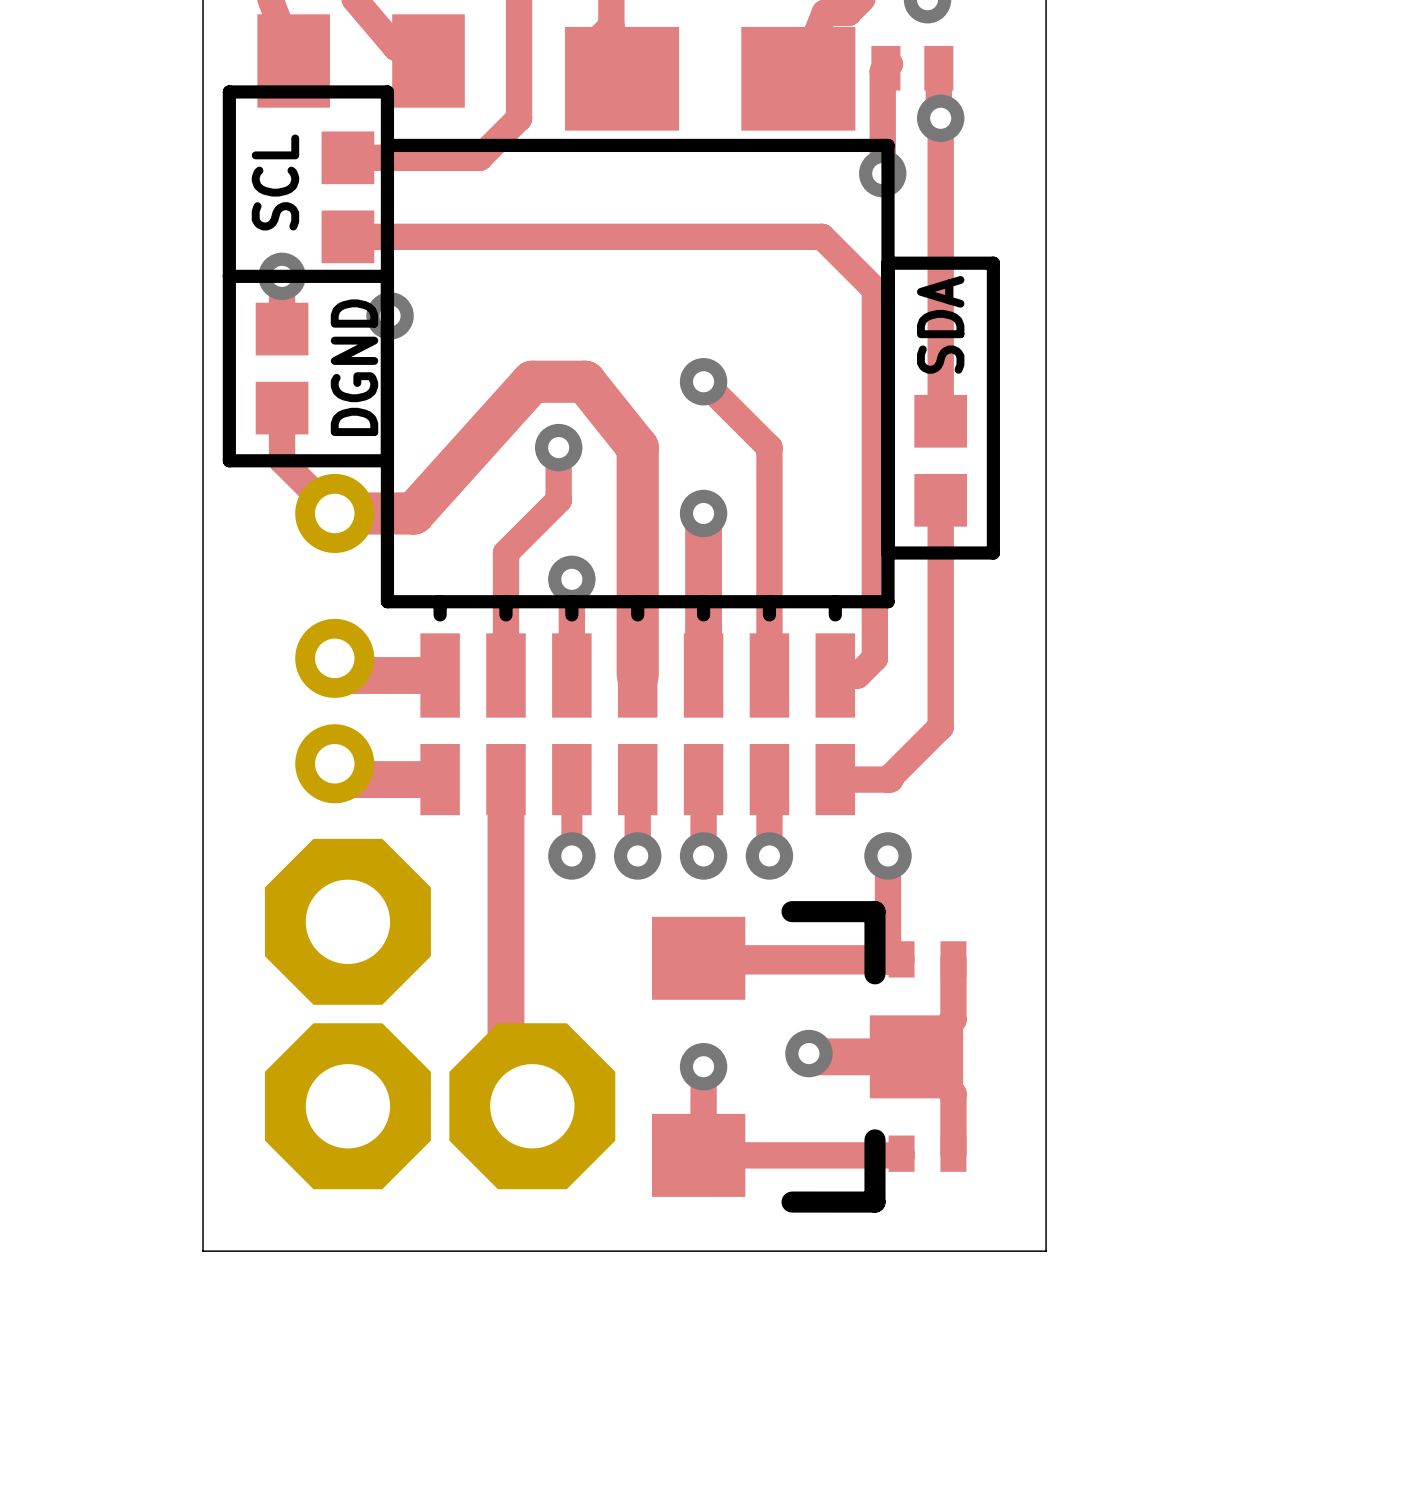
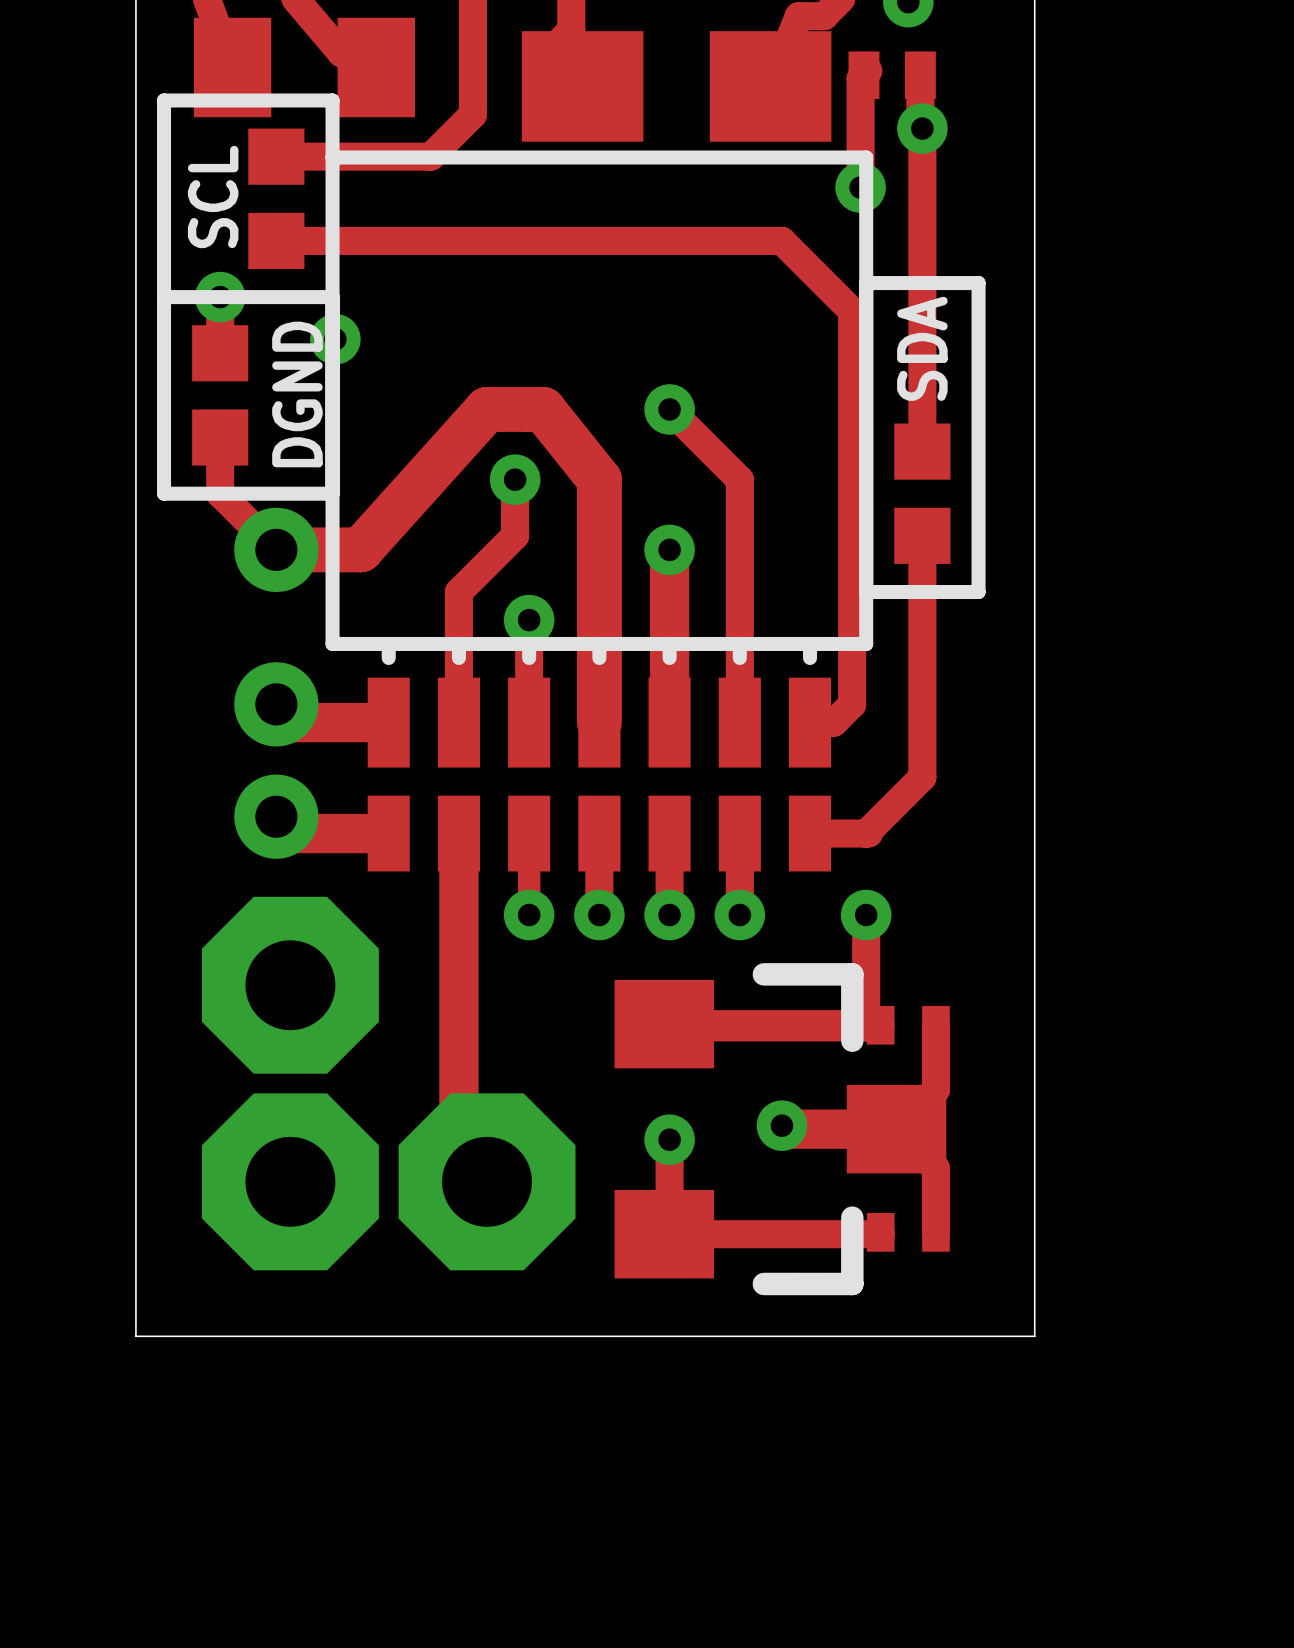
track: (519, 105) (519, 118) (479, 157) (347, 157) -> (472, 114) (430, 156) (276, 156)
part position: (347, 197) -> (276, 198)
track: (347, 236) (822, 236) -> (276, 240) (781, 240) (795, 254)

